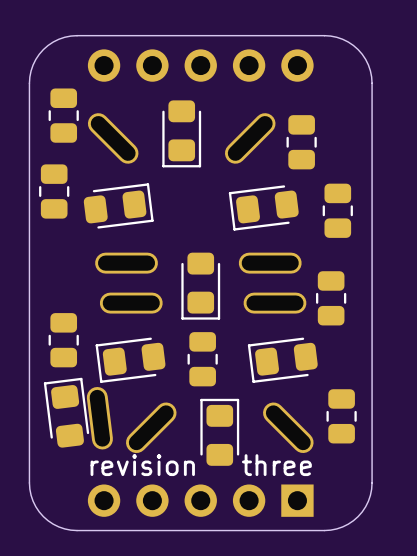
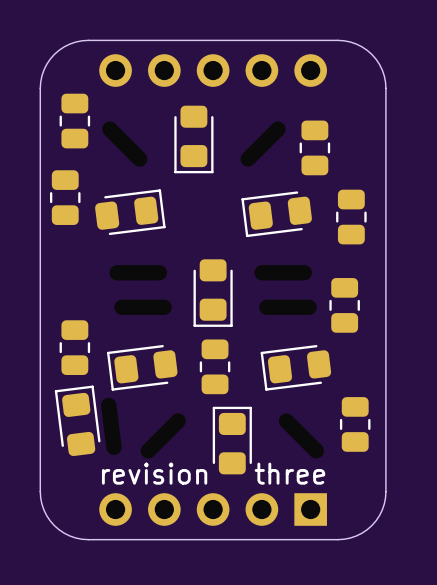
part footprint: [87, 113, 139, 164] -> [102, 121, 148, 167]
part footprint: [224, 113, 276, 164] -> [240, 121, 286, 167]
part footprint: [95, 252, 158, 274] -> [109, 265, 168, 281]
part footprint: [238, 252, 302, 274] -> [254, 265, 313, 281]
part footprint: [99, 292, 163, 314] -> [114, 299, 172, 315]
part footprint: [243, 292, 307, 314] -> [259, 299, 317, 315]
part footprint: [86, 386, 113, 450] -> [101, 397, 122, 456]
part footprint: [125, 402, 177, 454] -> [140, 413, 186, 459]
part footprint: [263, 402, 314, 454] -> [278, 413, 325, 459]

